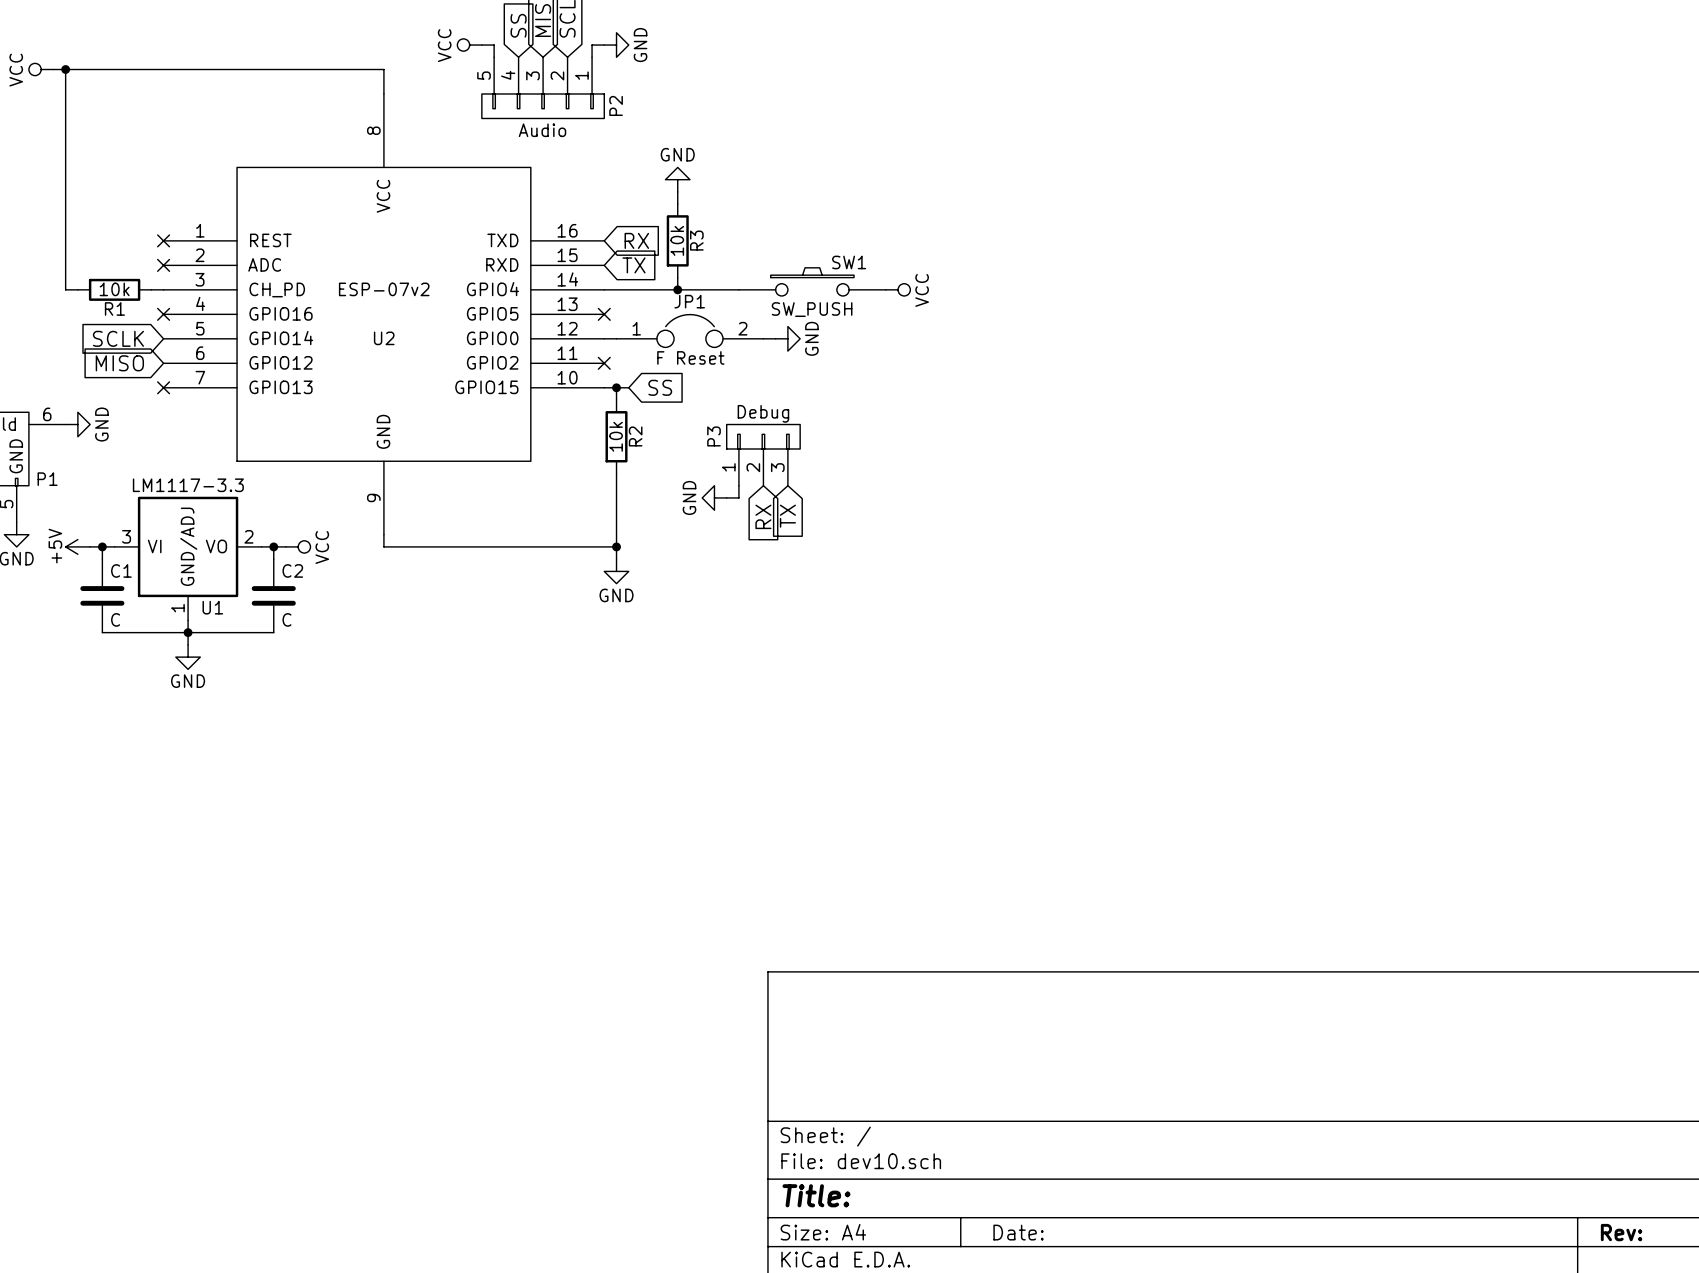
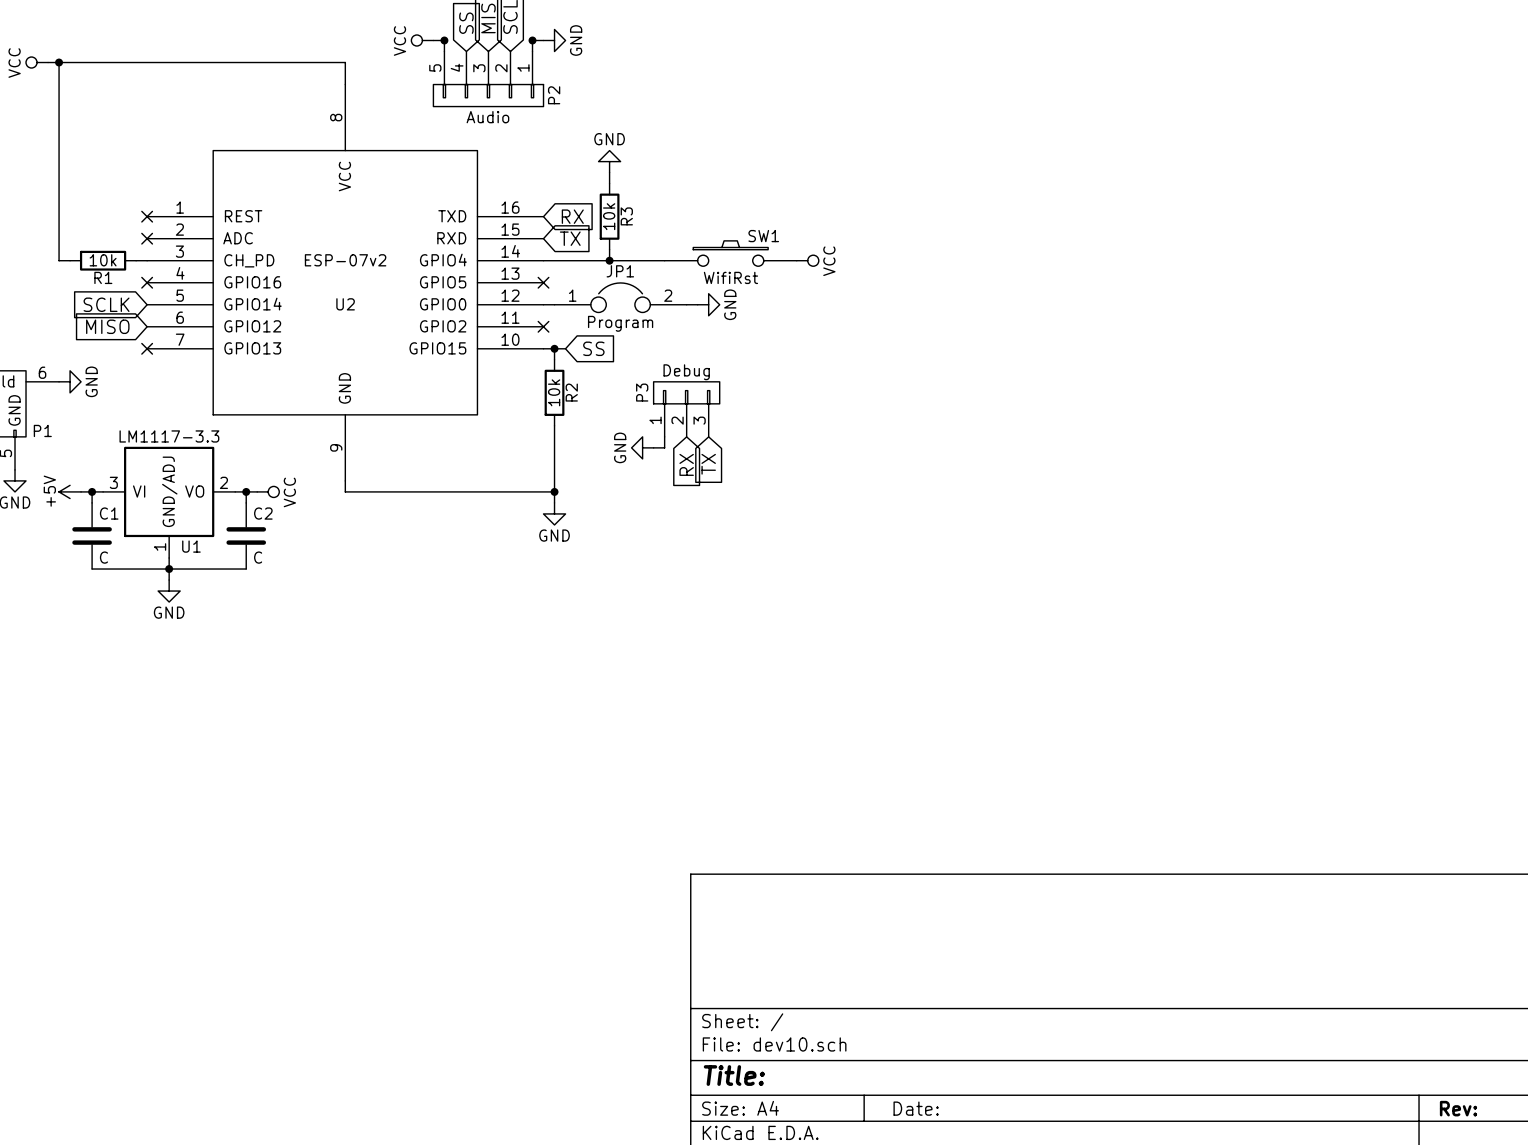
junction: none -> (444, 40)
junction: none -> (532, 40)
SW1 value: SW_PUSH (812, 309) -> WifiRst (730, 277)
JP1 value: F Reset (690, 357) -> Program (620, 323)

